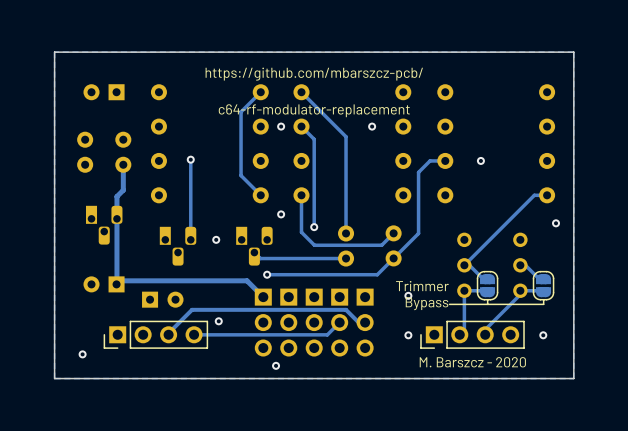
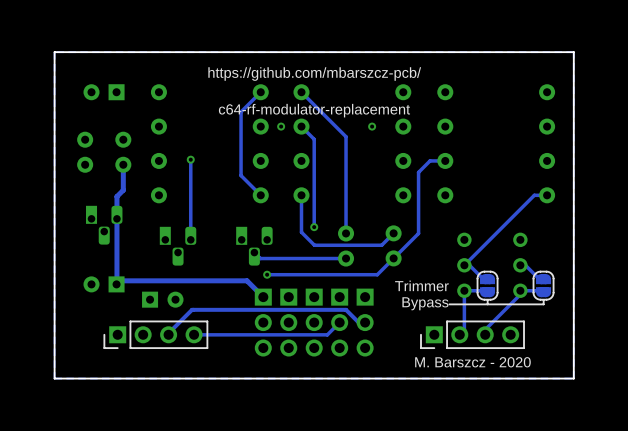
via: (480, 160) -> none
via: (281, 214) -> none
via: (556, 223) -> none
via: (216, 239) -> none
via: (408, 295) -> none
via: (218, 321) -> none
via: (408, 335) -> none
via: (543, 335) -> none
via: (82, 354) -> none
via: (276, 365) -> none

